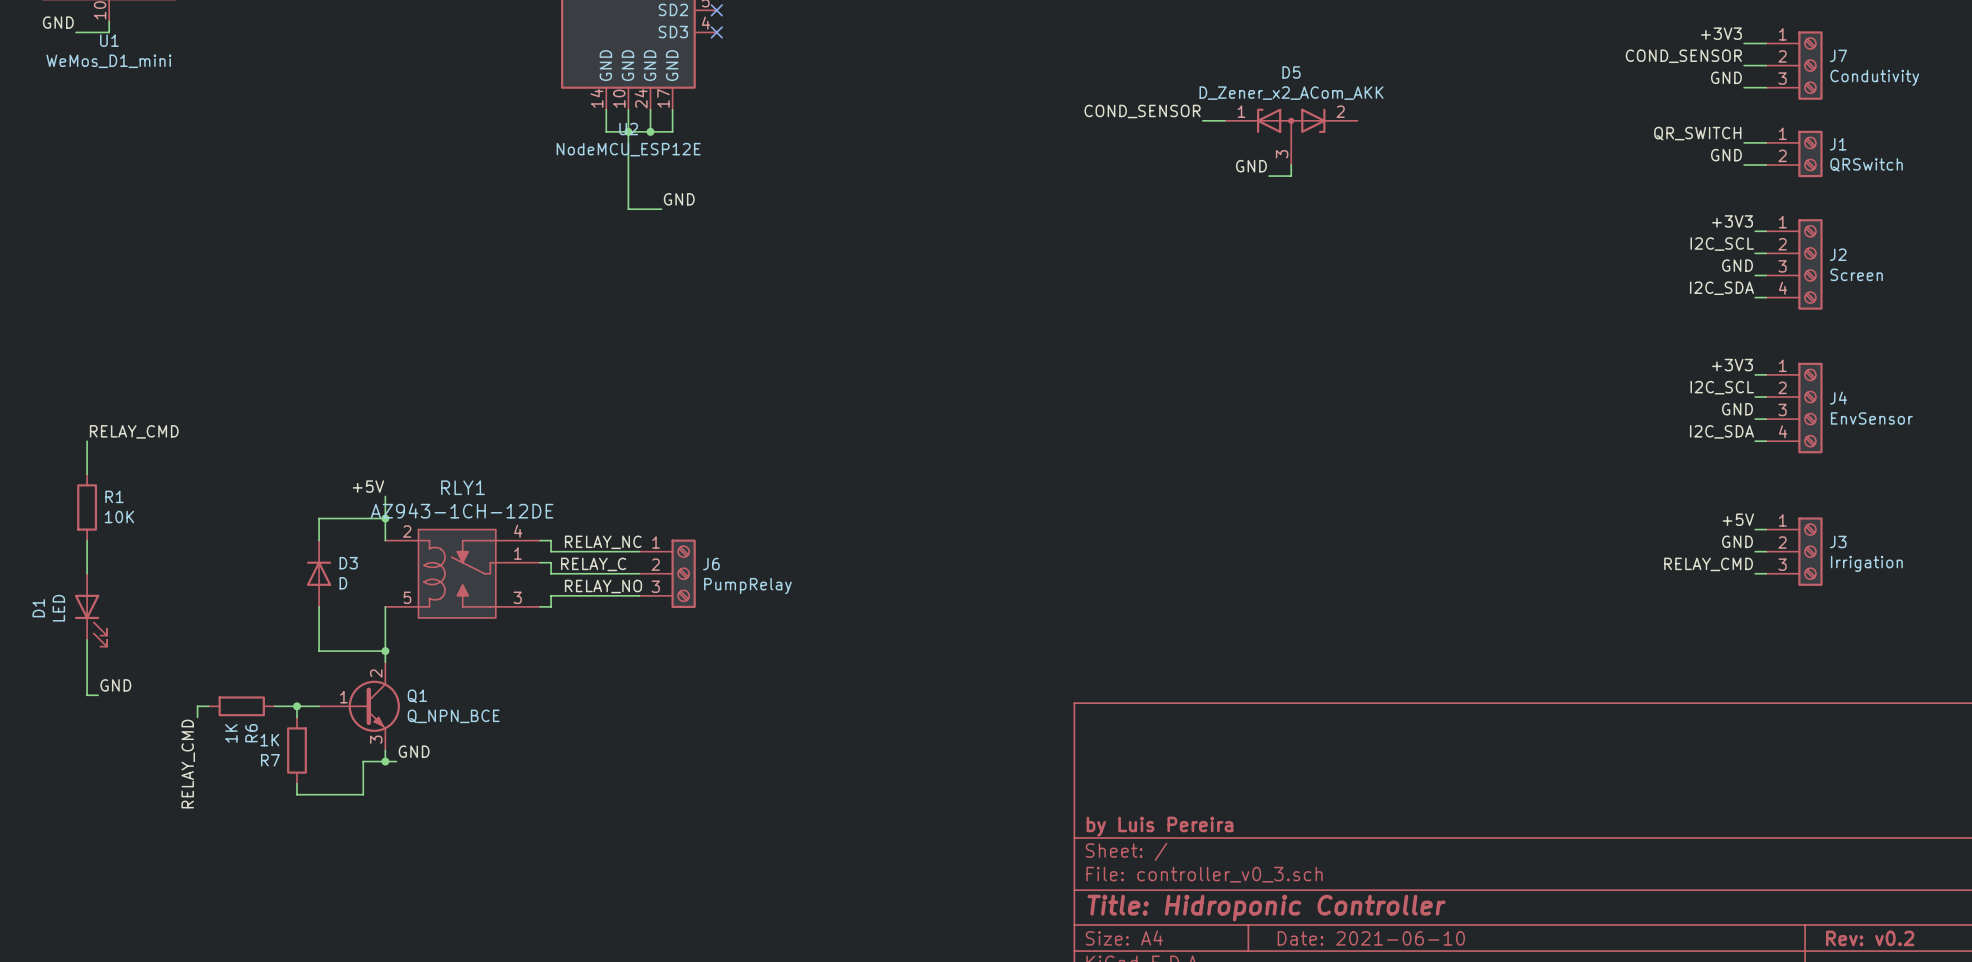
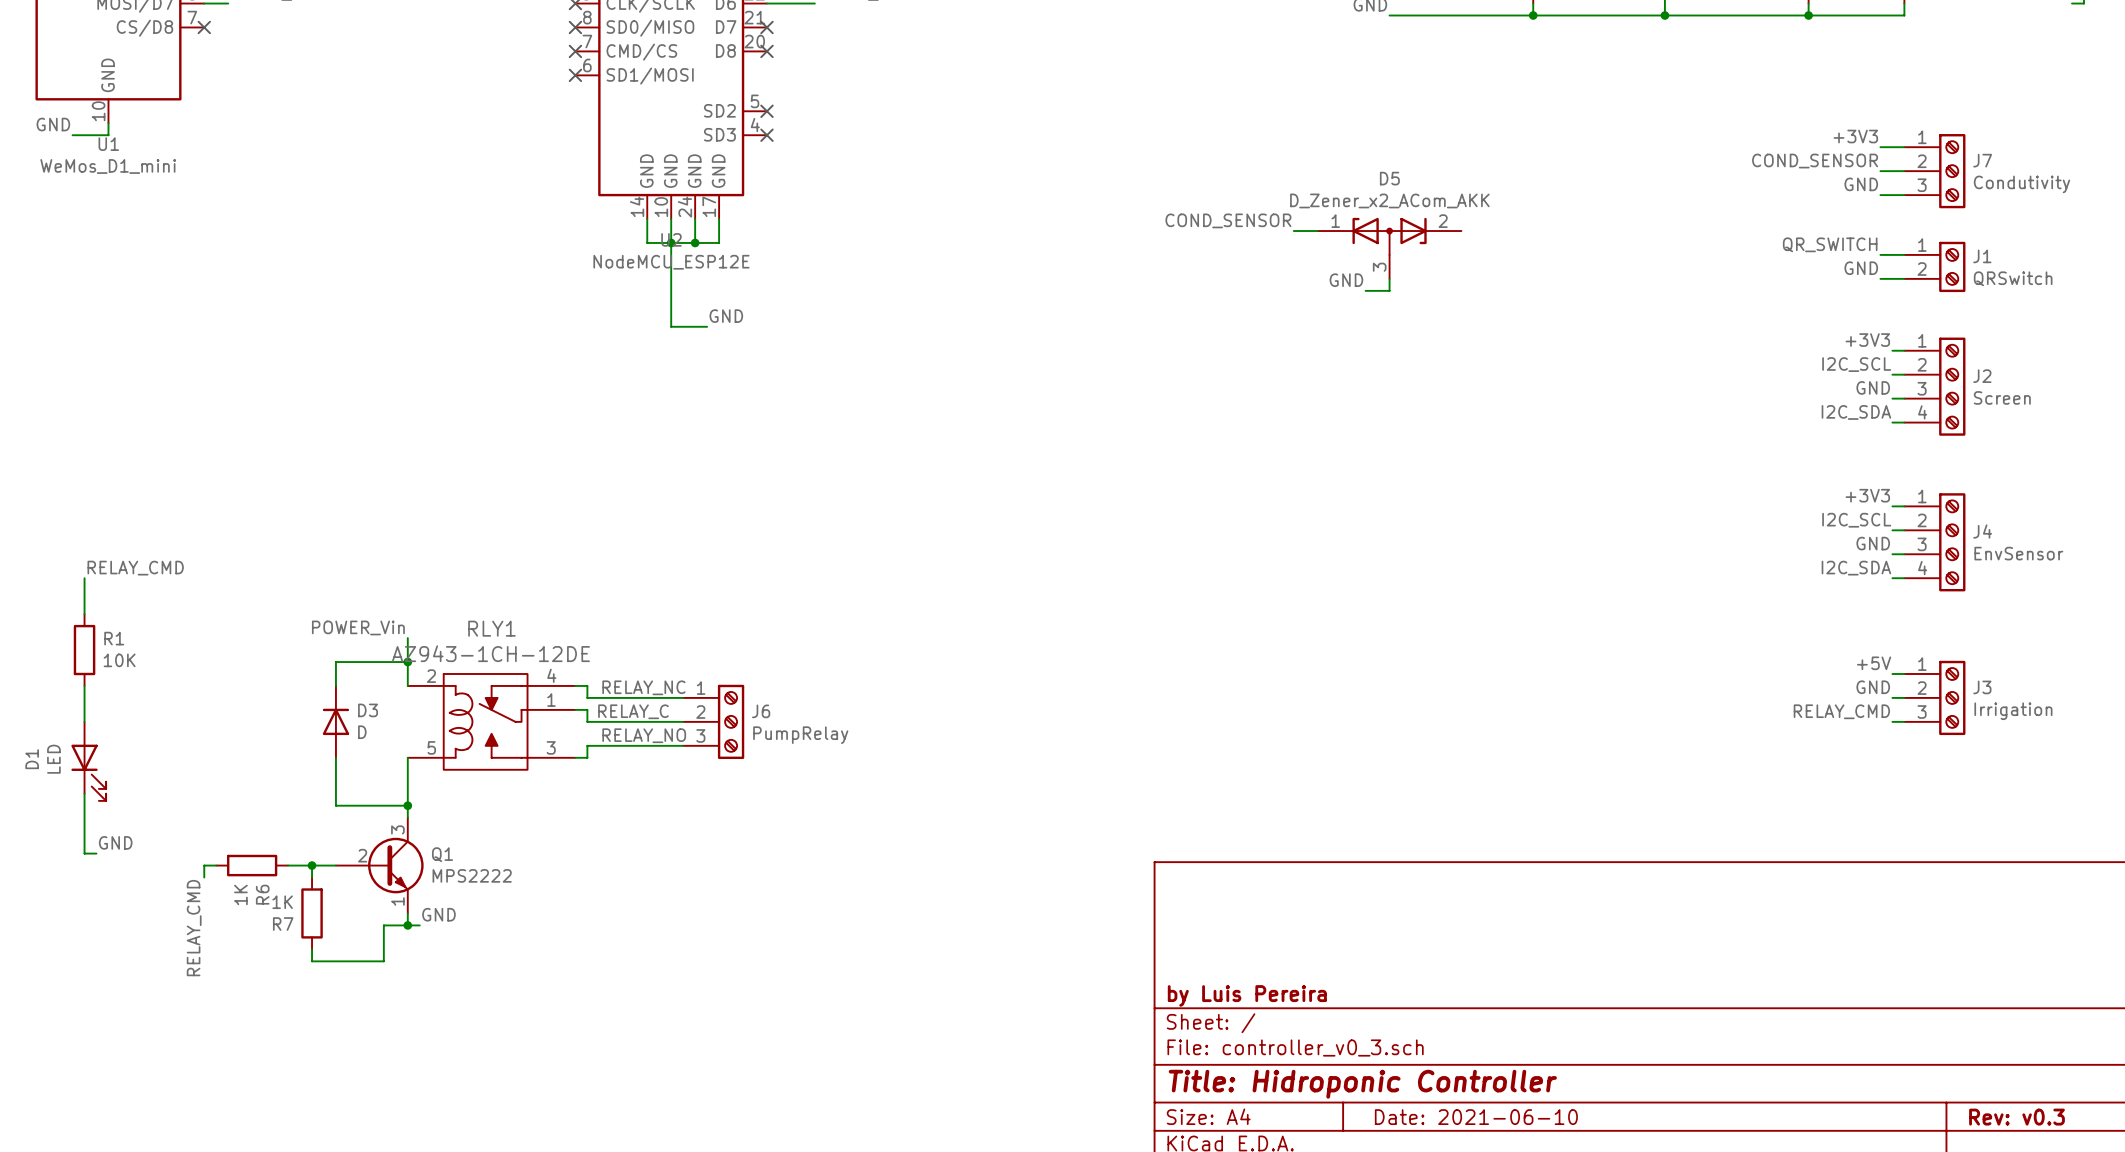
label: +5V (368, 486) -> POWER_Vin (358, 627)
Q1 pin number: 2 (376, 673) -> 3 (397, 829)
Q1 pin number: 1 (343, 697) -> 2 (362, 855)
Q1 value: Q_NPN_BCE (453, 716) -> MPS2222 (472, 875)
Q1 pin number: 3 (376, 739) -> 1 (397, 901)
title block: Rev: v0.2 (1870, 938) -> Rev: v0.3 (2017, 1117)

